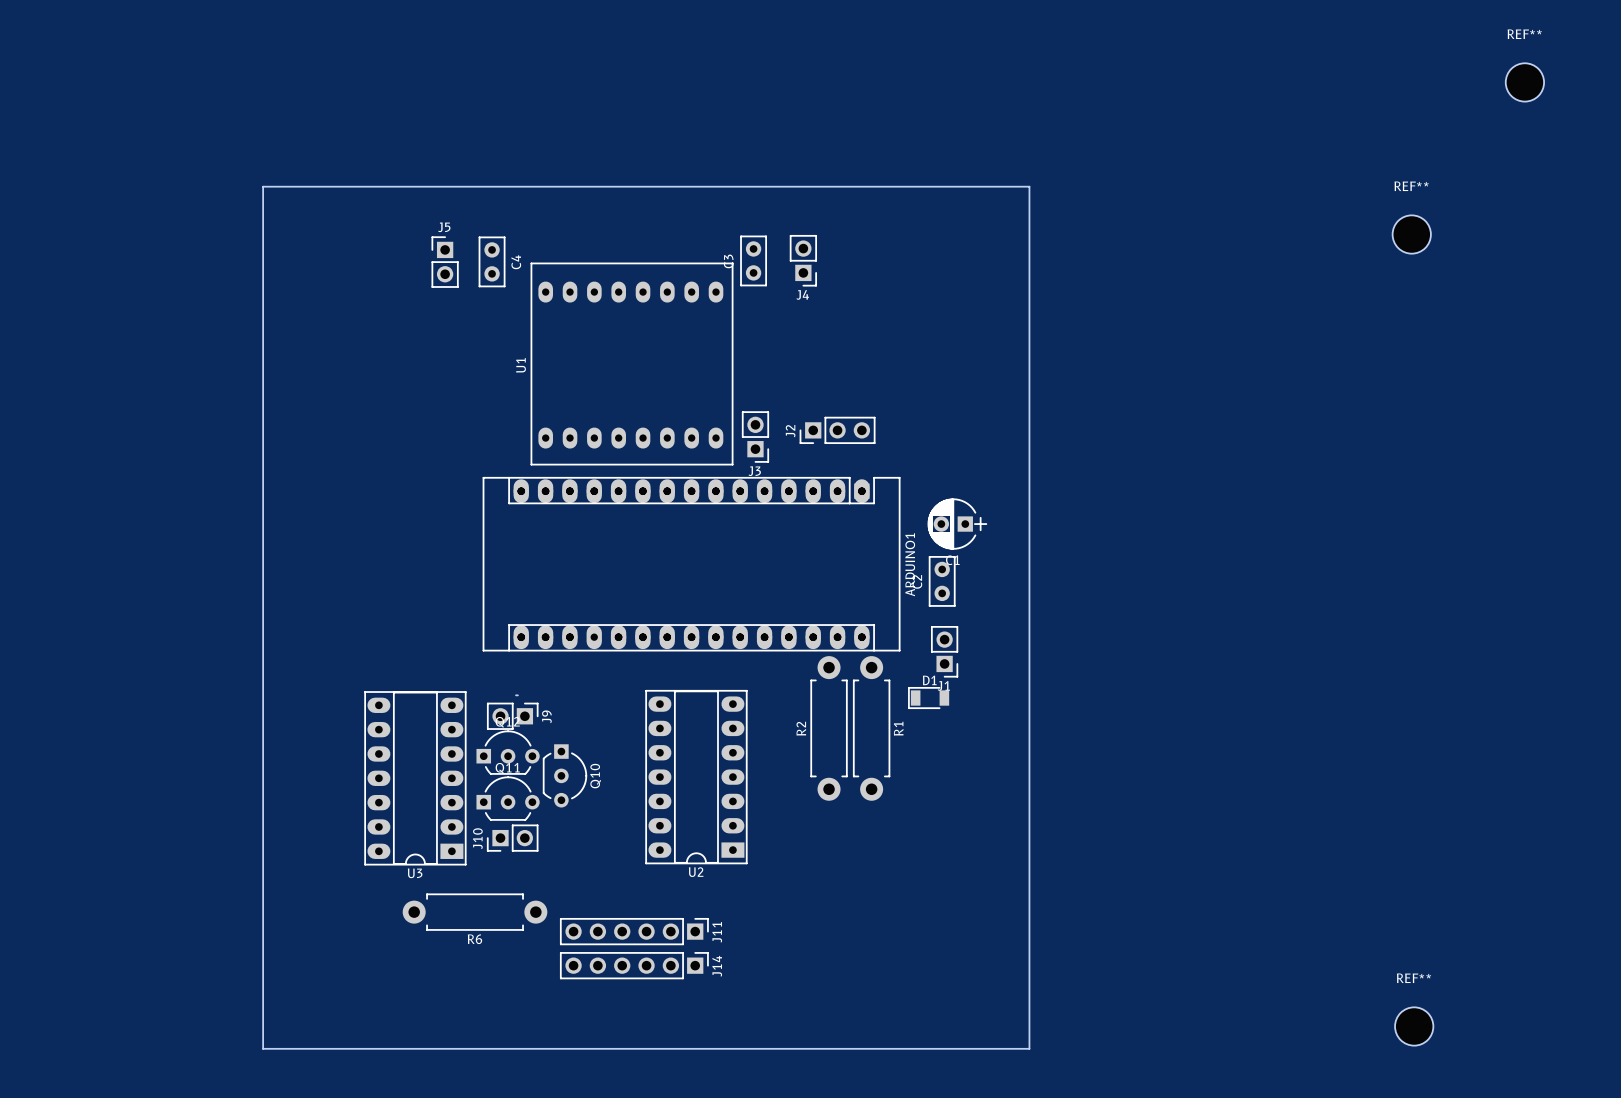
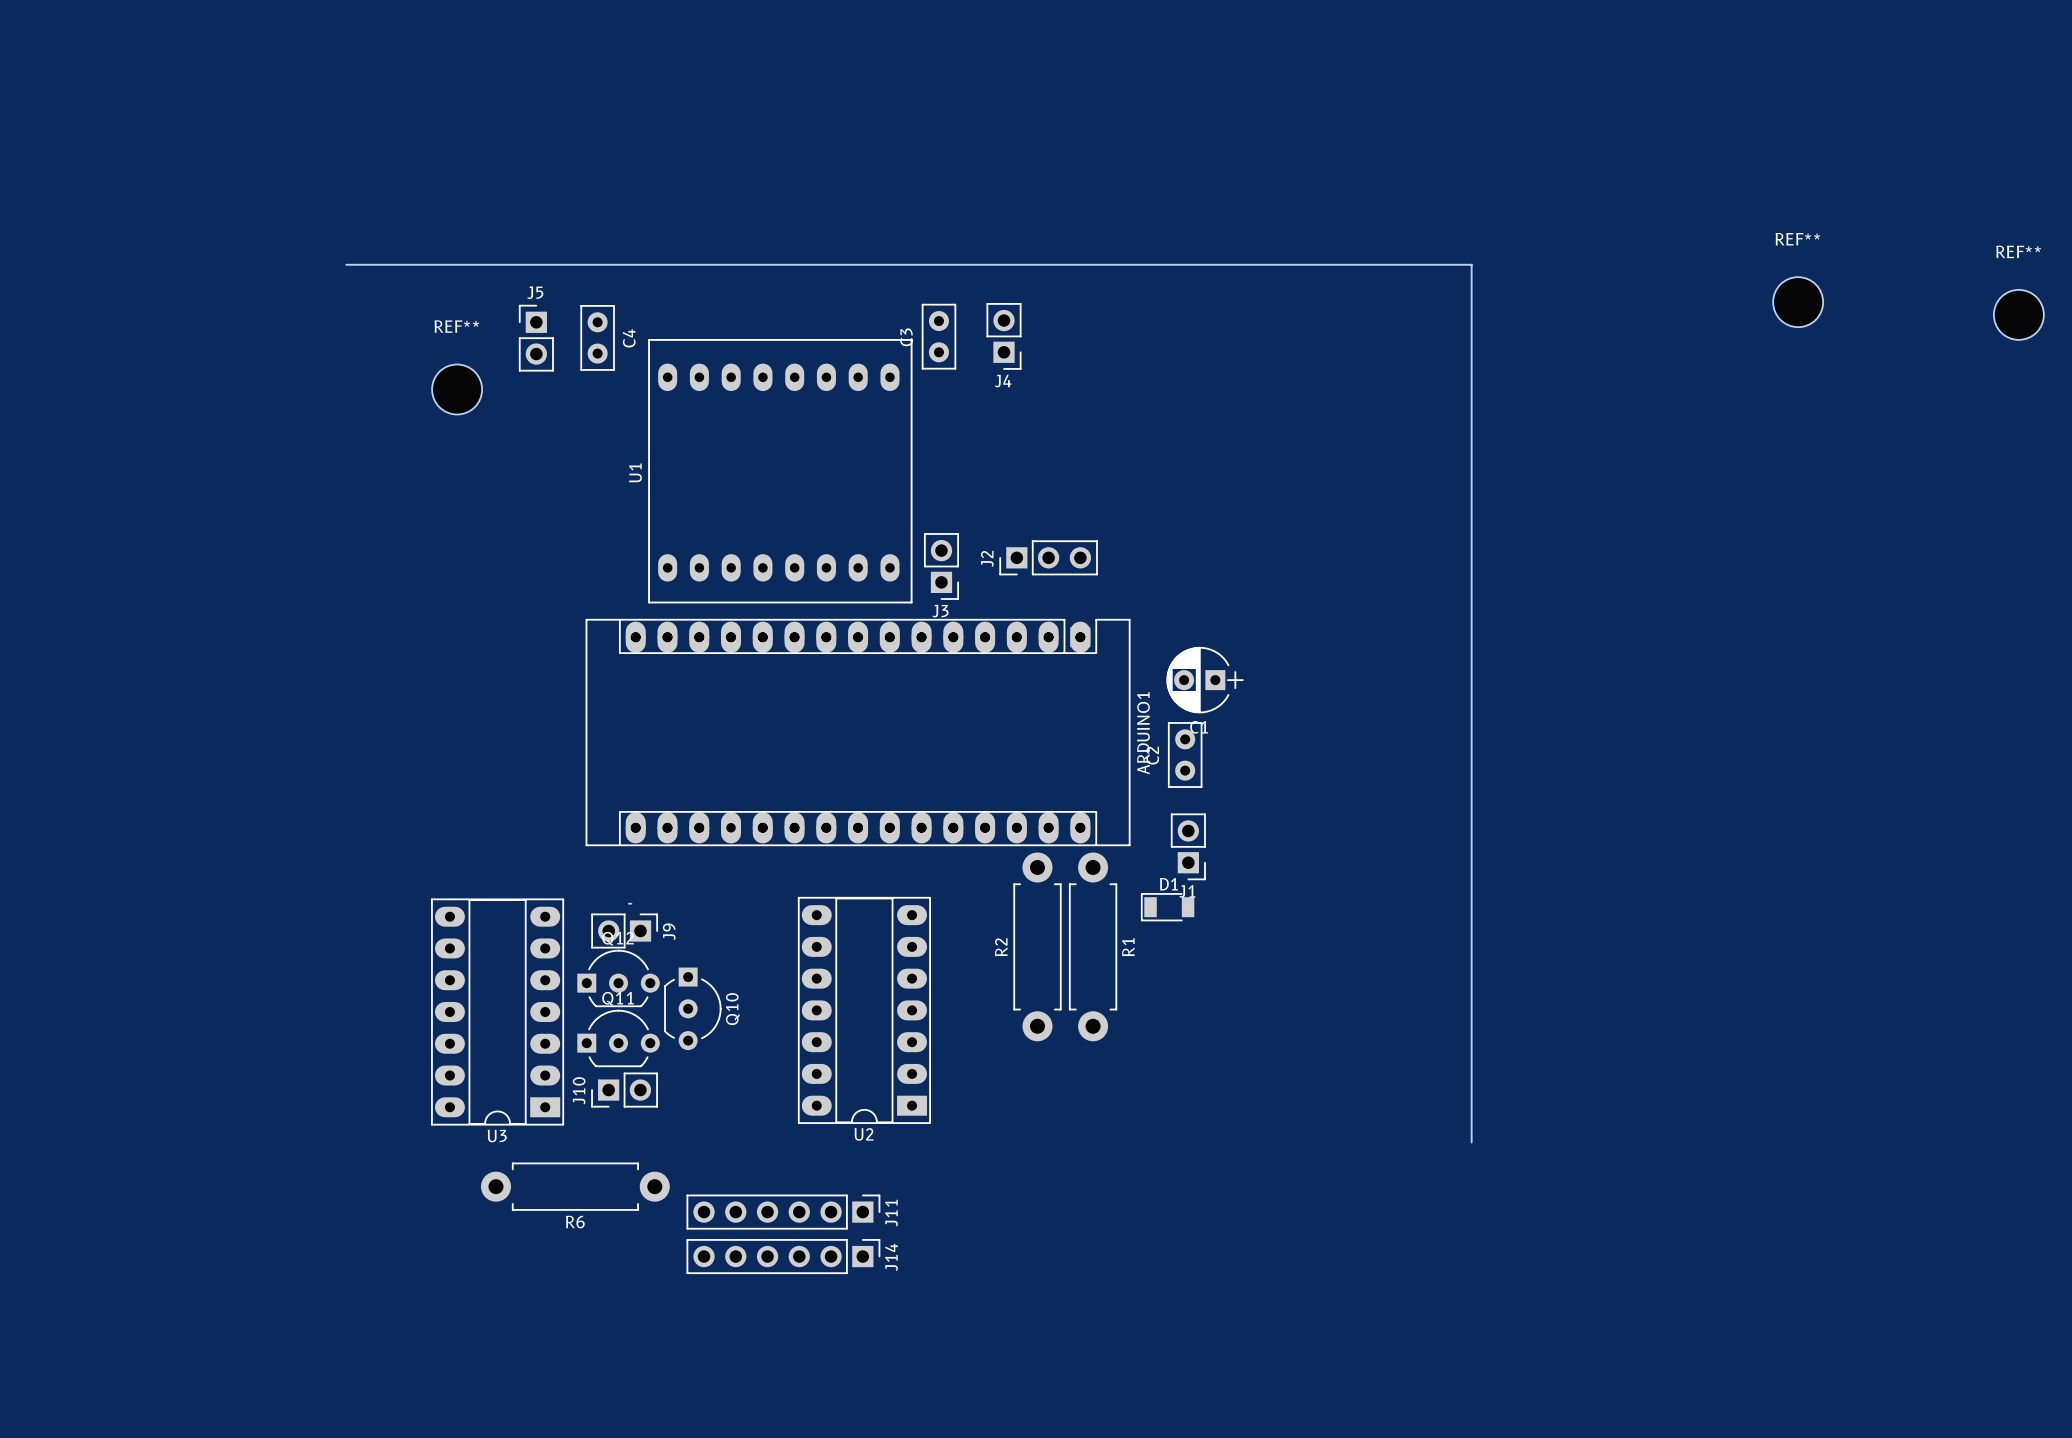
REF** position: (1524, 82) -> (2018, 314)
board edge: (263, 186) (263, 1048) (1029, 1048) (1029, 186) (263, 186) -> none
board edge: none -> (346, 264) (1471, 264) (1471, 1142)
REF**: none -> (457, 389)
REF**: (1414, 1026) -> none

